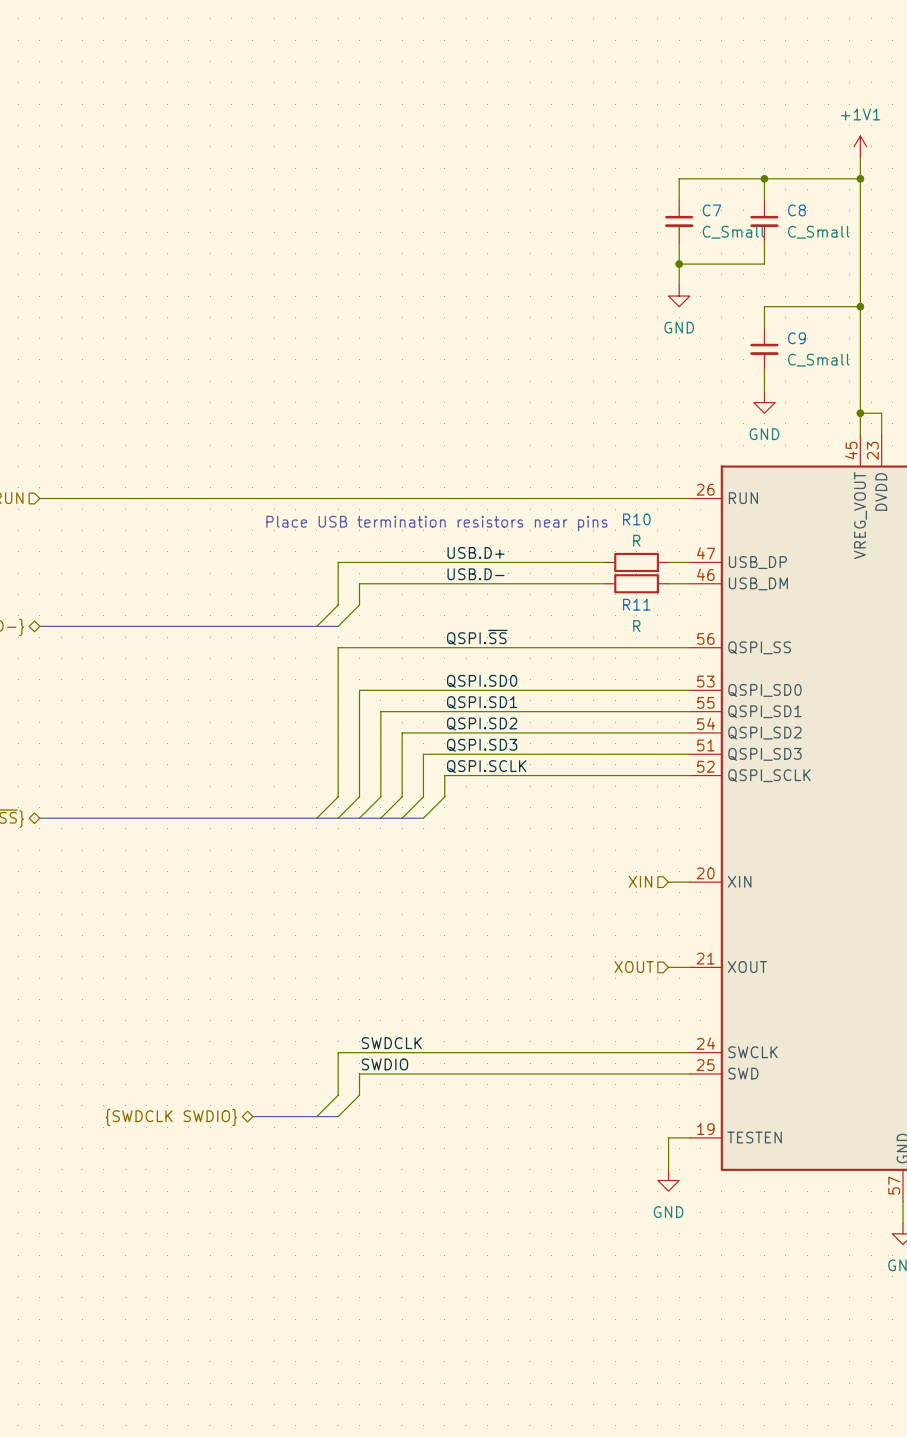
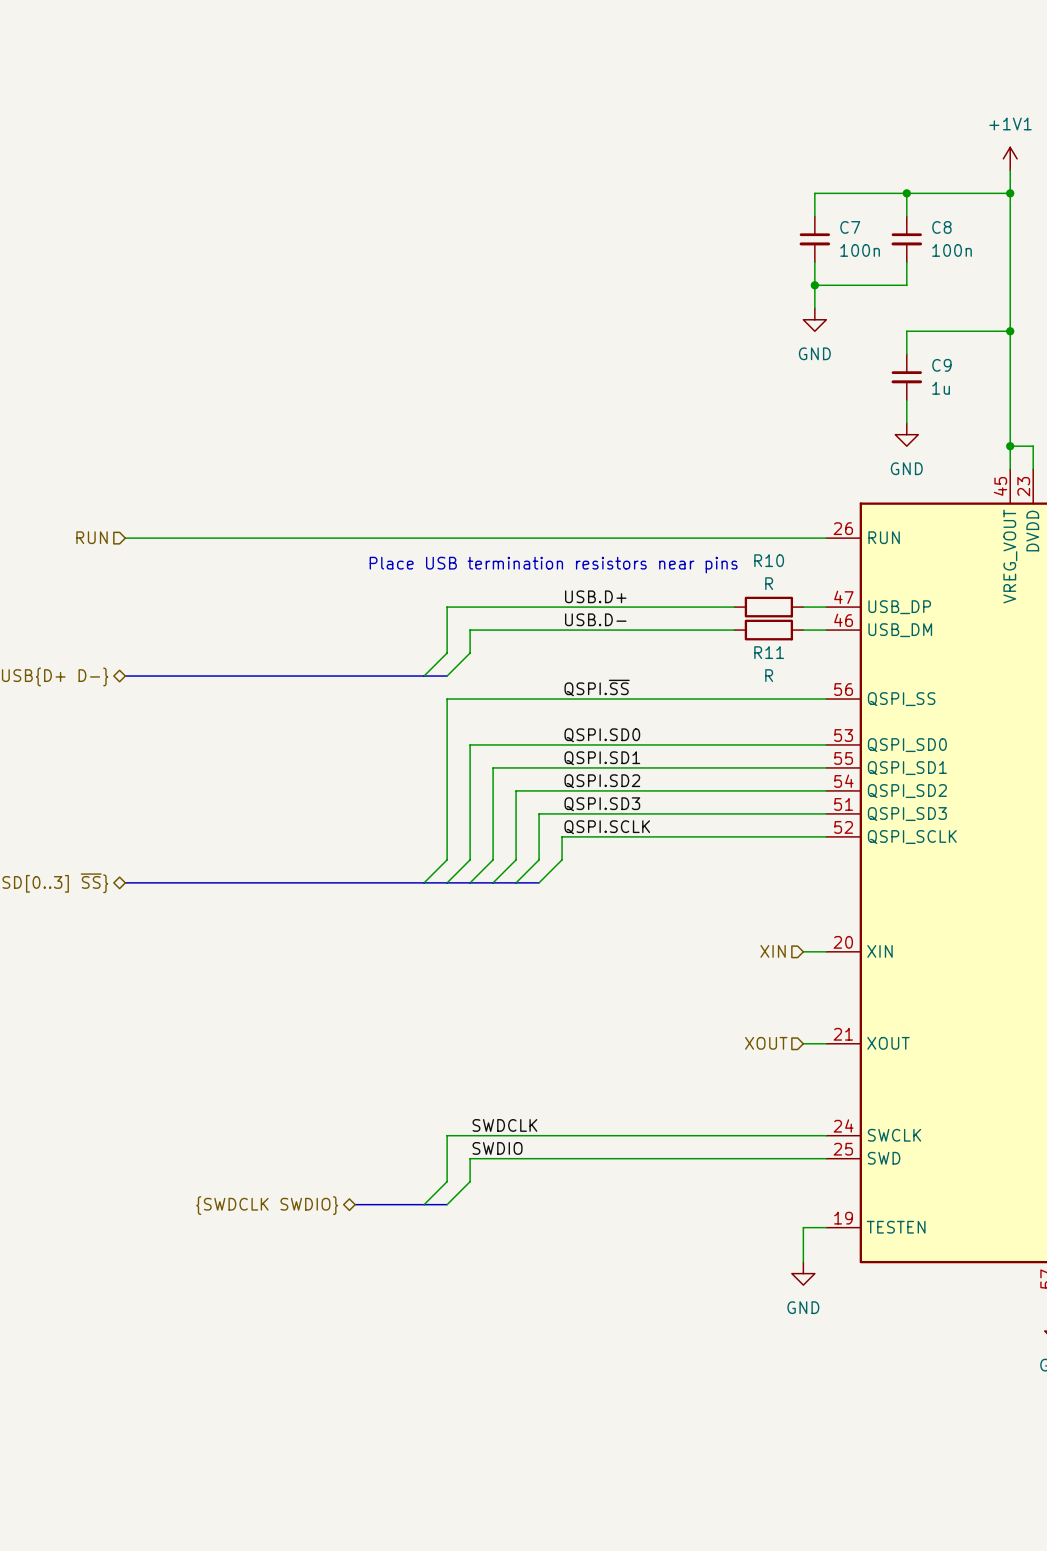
C7 value: C_Small (733, 232) -> 100n (860, 250)
C8 value: C_Small (818, 232) -> 100n (952, 250)
C9 value: C_Small (818, 360) -> 1u (941, 388)

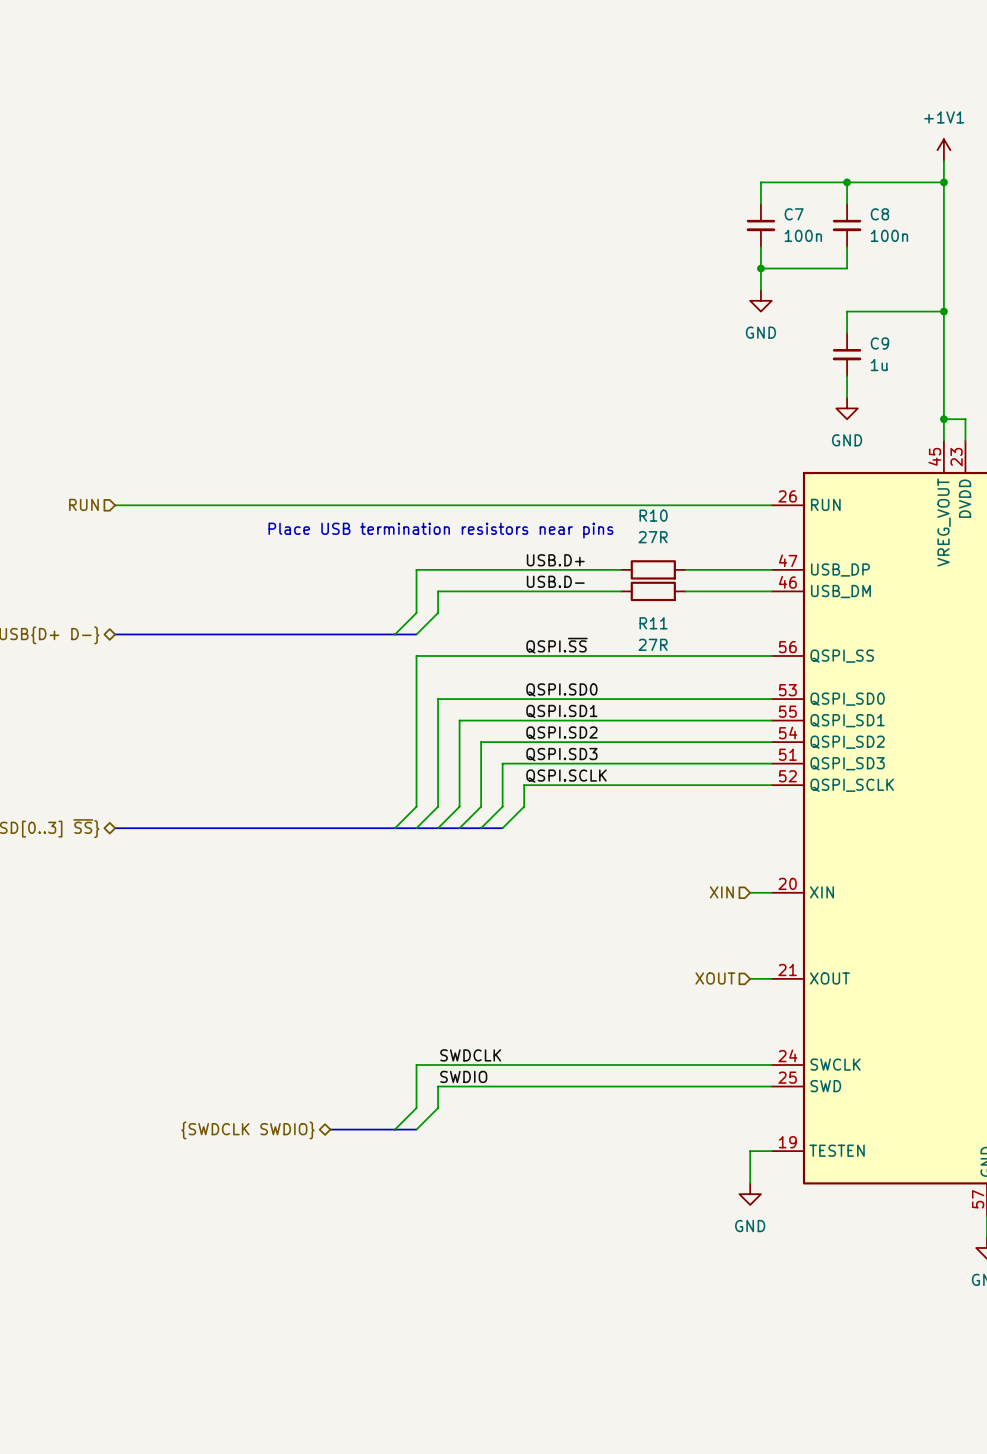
R10 name position: R10 (769, 560) -> R10 (653, 515)
text position: Place USB termination resistors near pins (553, 565) -> Place USB termination resistors near pins (440, 530)
R10 value: R (769, 583) -> 27R (653, 537)
wire: (665, 607) (734, 607) -> (750, 569) (685, 569)
R10 position: (768, 607) -> (653, 569)
wire: (665, 630) (734, 630) -> (750, 591) (685, 591)
R11 position: (768, 630) -> (653, 591)
R11 name position: R11 (769, 652) -> R11 (653, 623)
R11 value: R (769, 675) -> 27R (653, 644)

